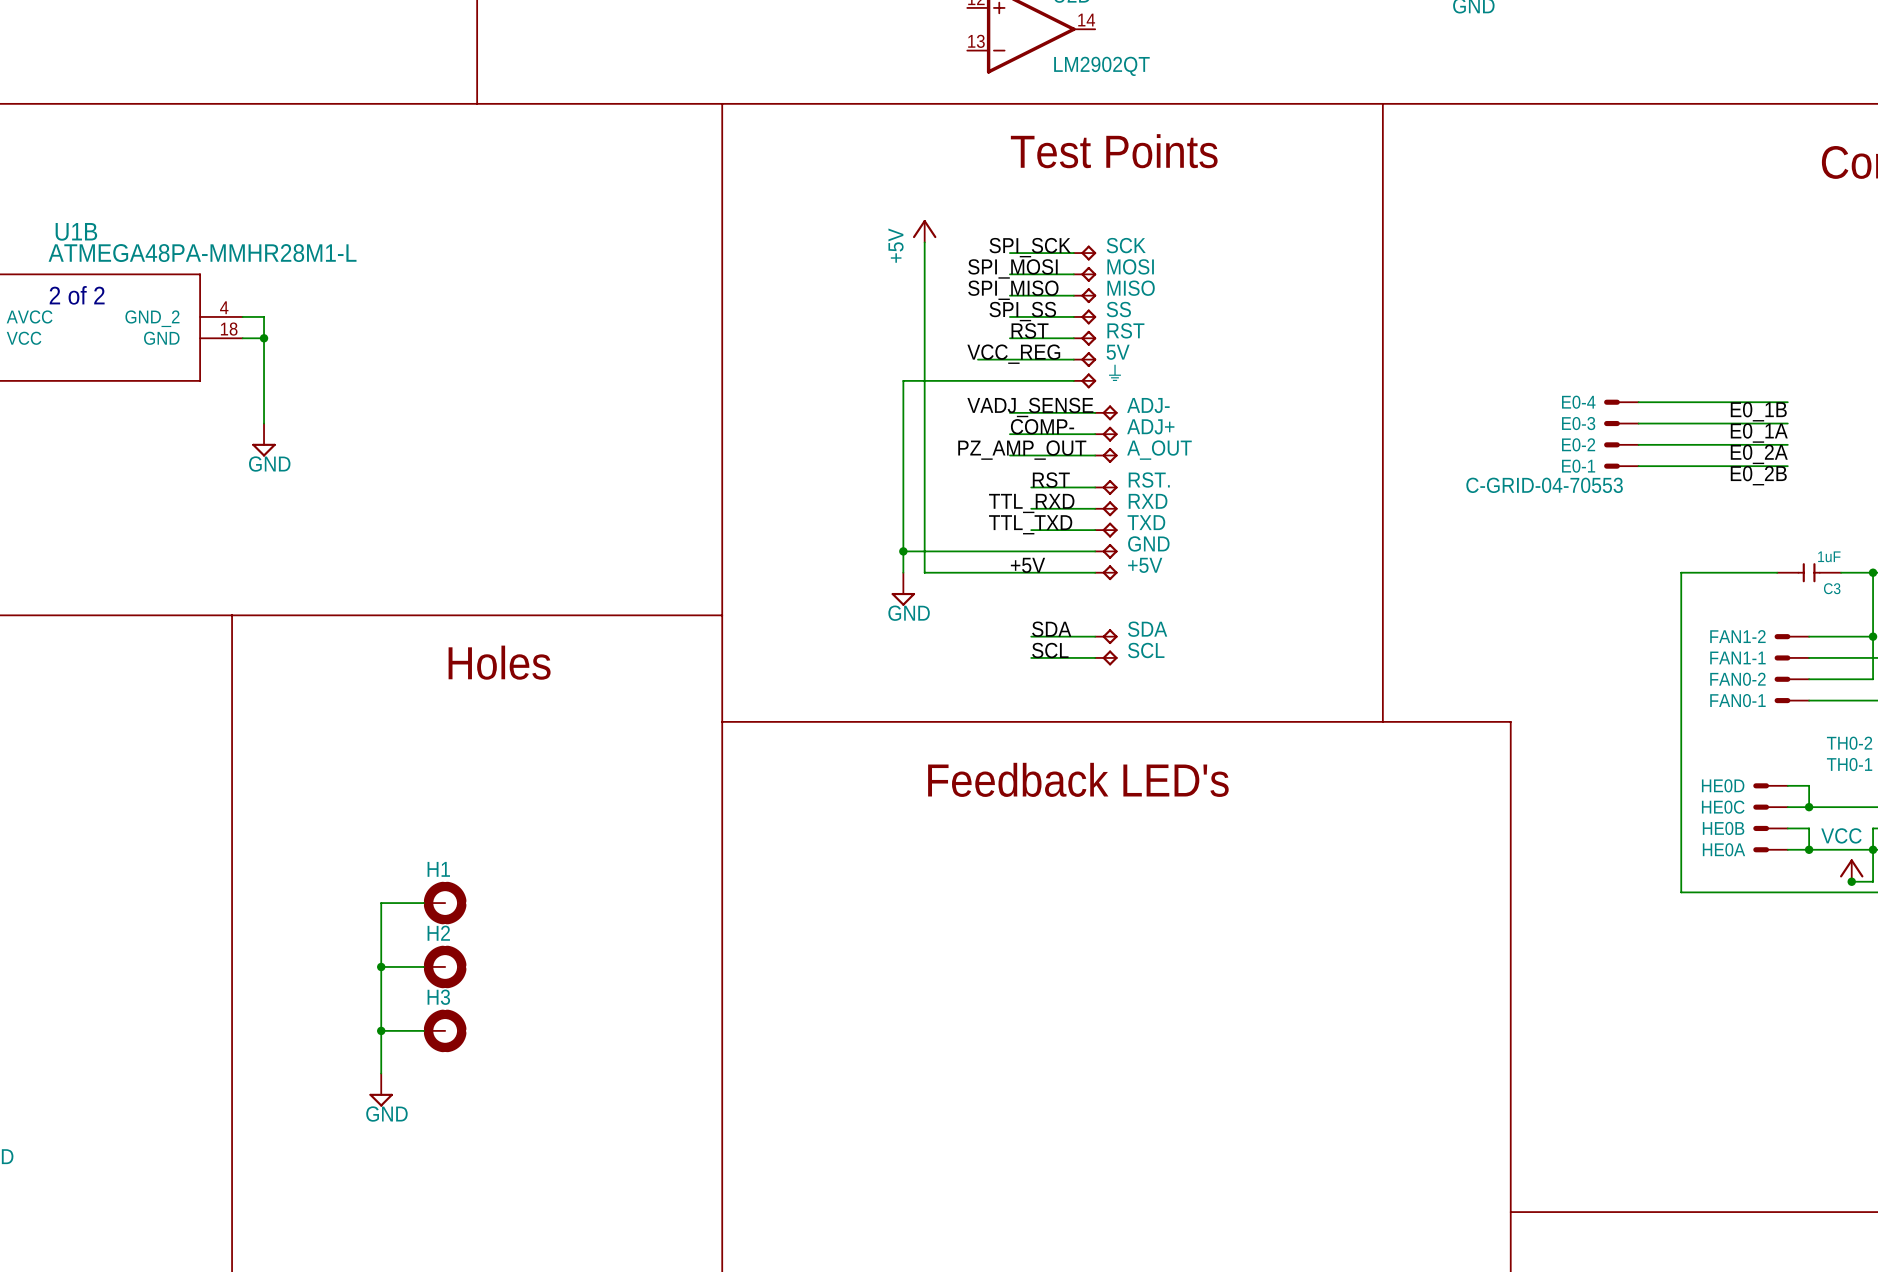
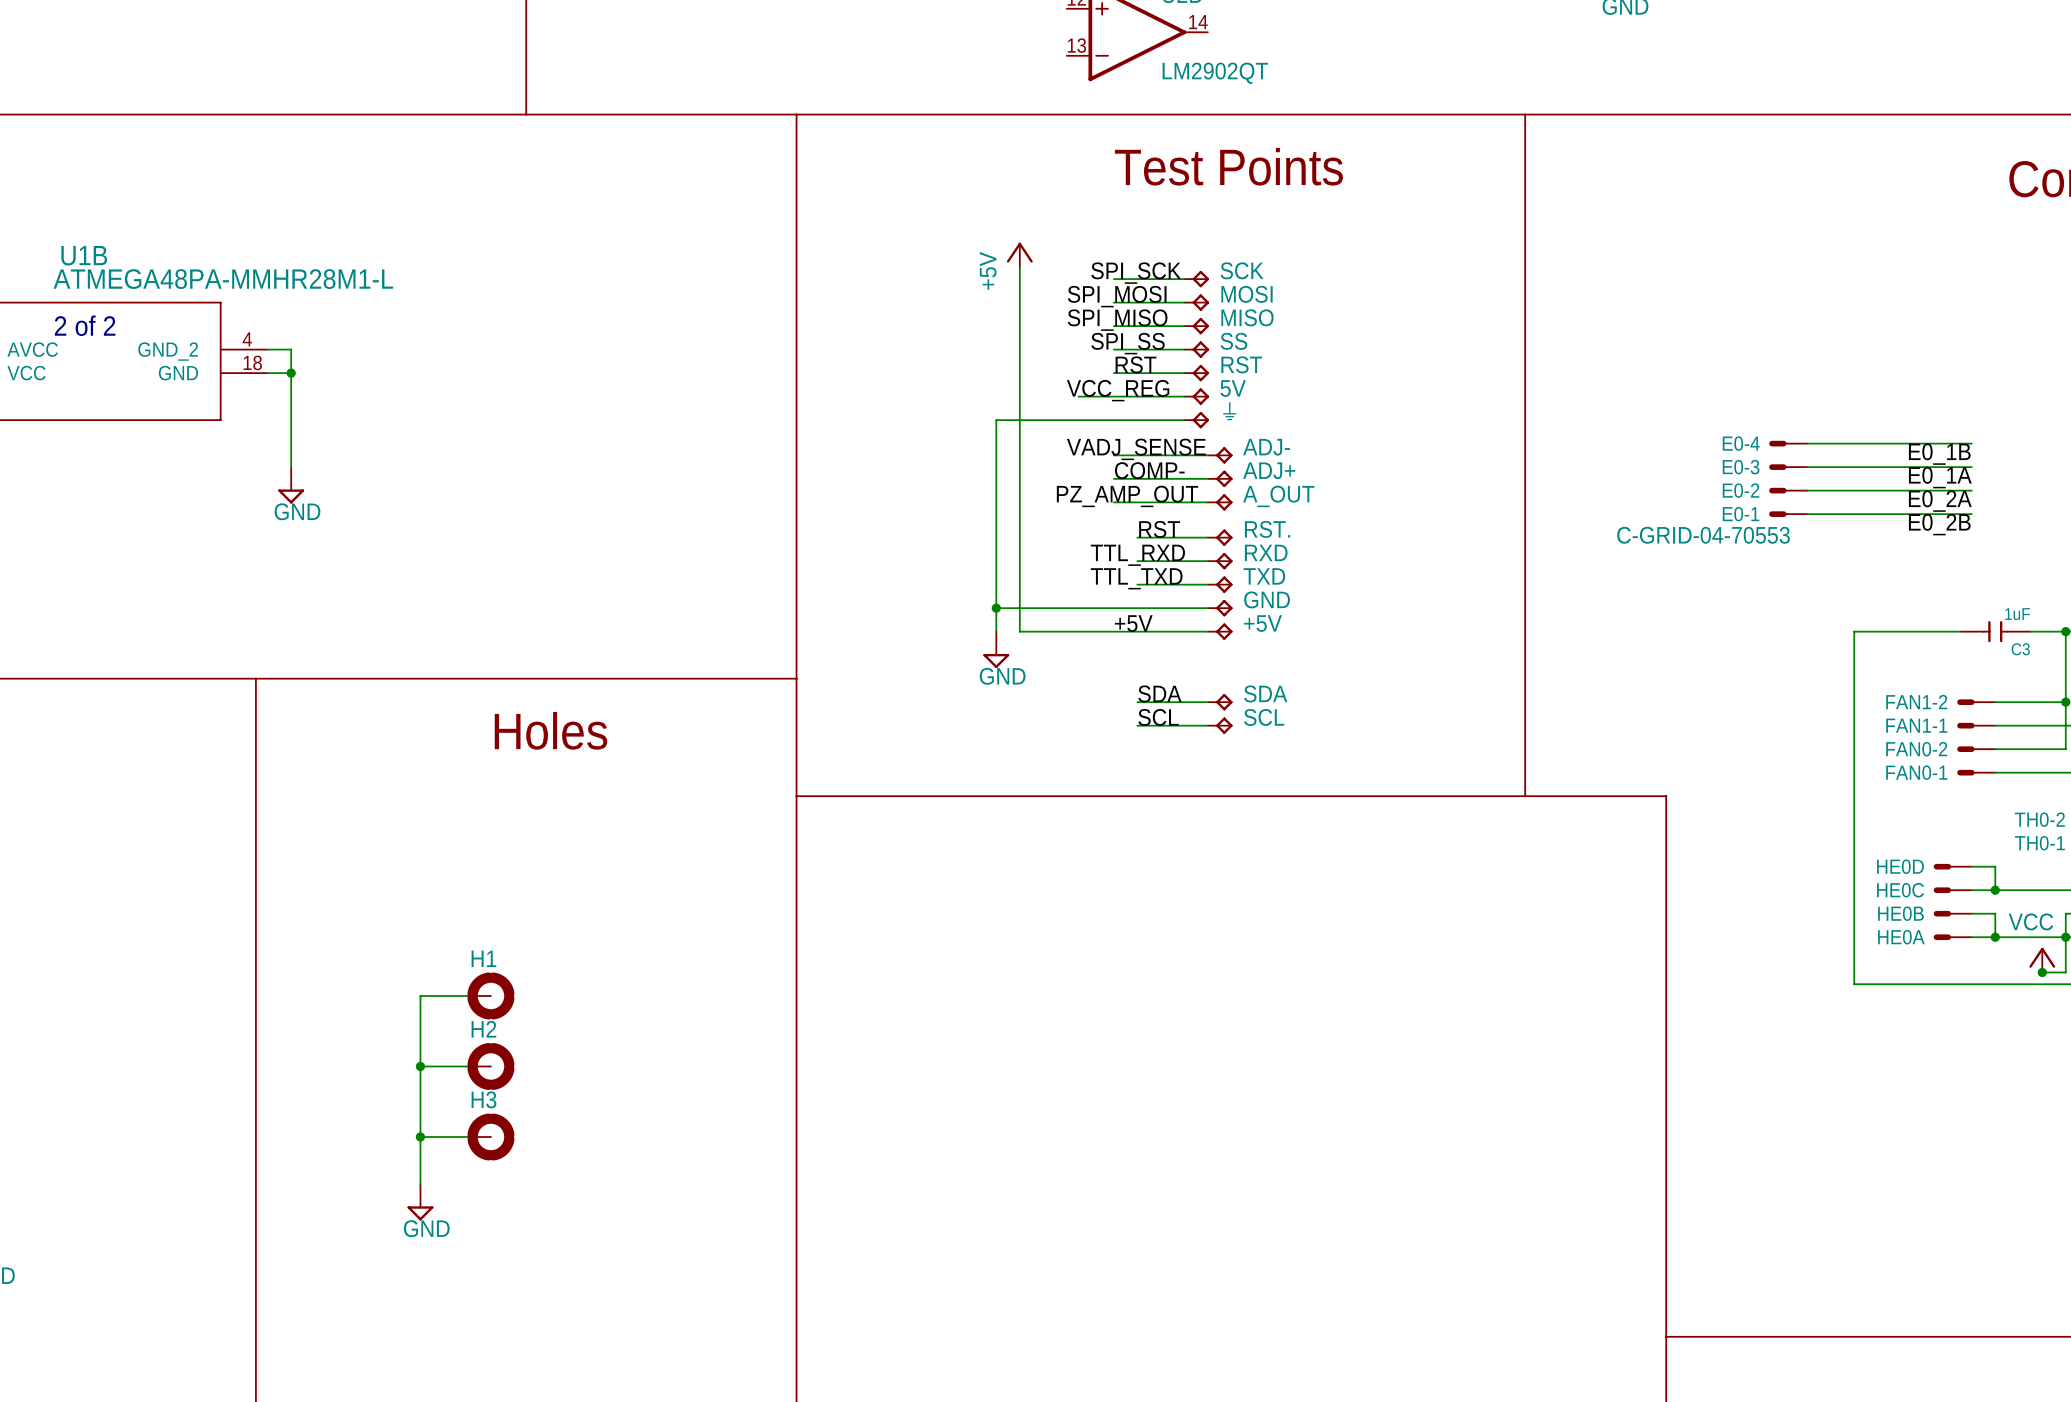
text: Feedback LED's (1078, 779) -> none

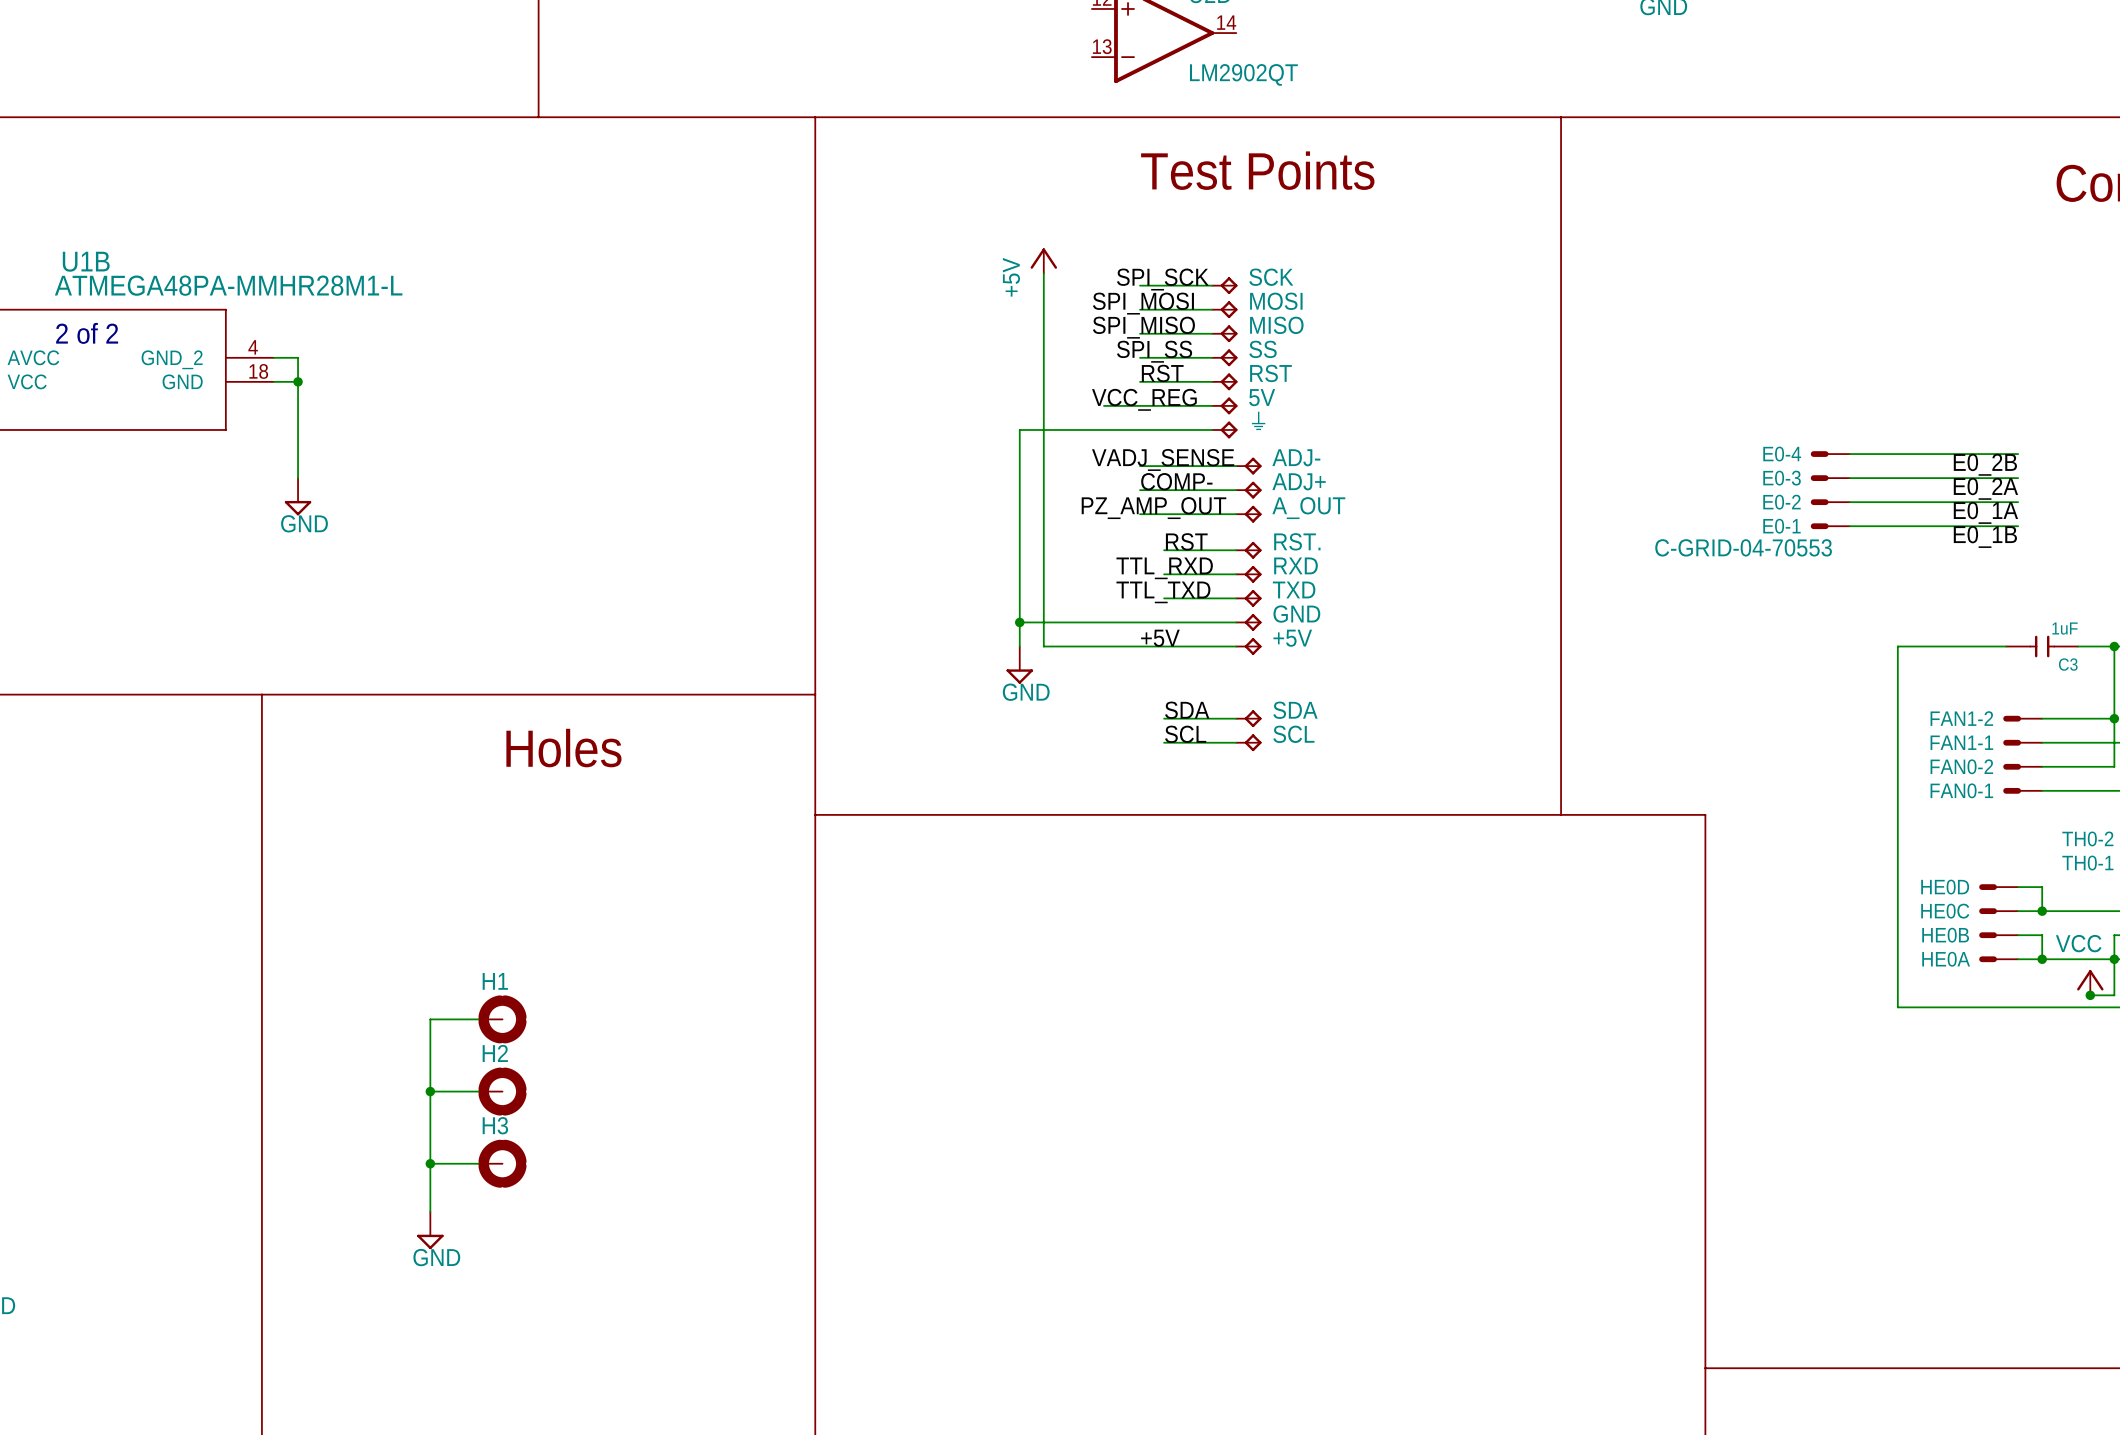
label: E0_1B (1939, 454) -> E0_2B (1985, 464)
label: E0_1A (1940, 477) -> E0_2A (1985, 488)
label: E0_2A (1940, 501) -> E0_1A (1985, 512)
label: E0_2B (1939, 524) -> E0_1B (1985, 536)

